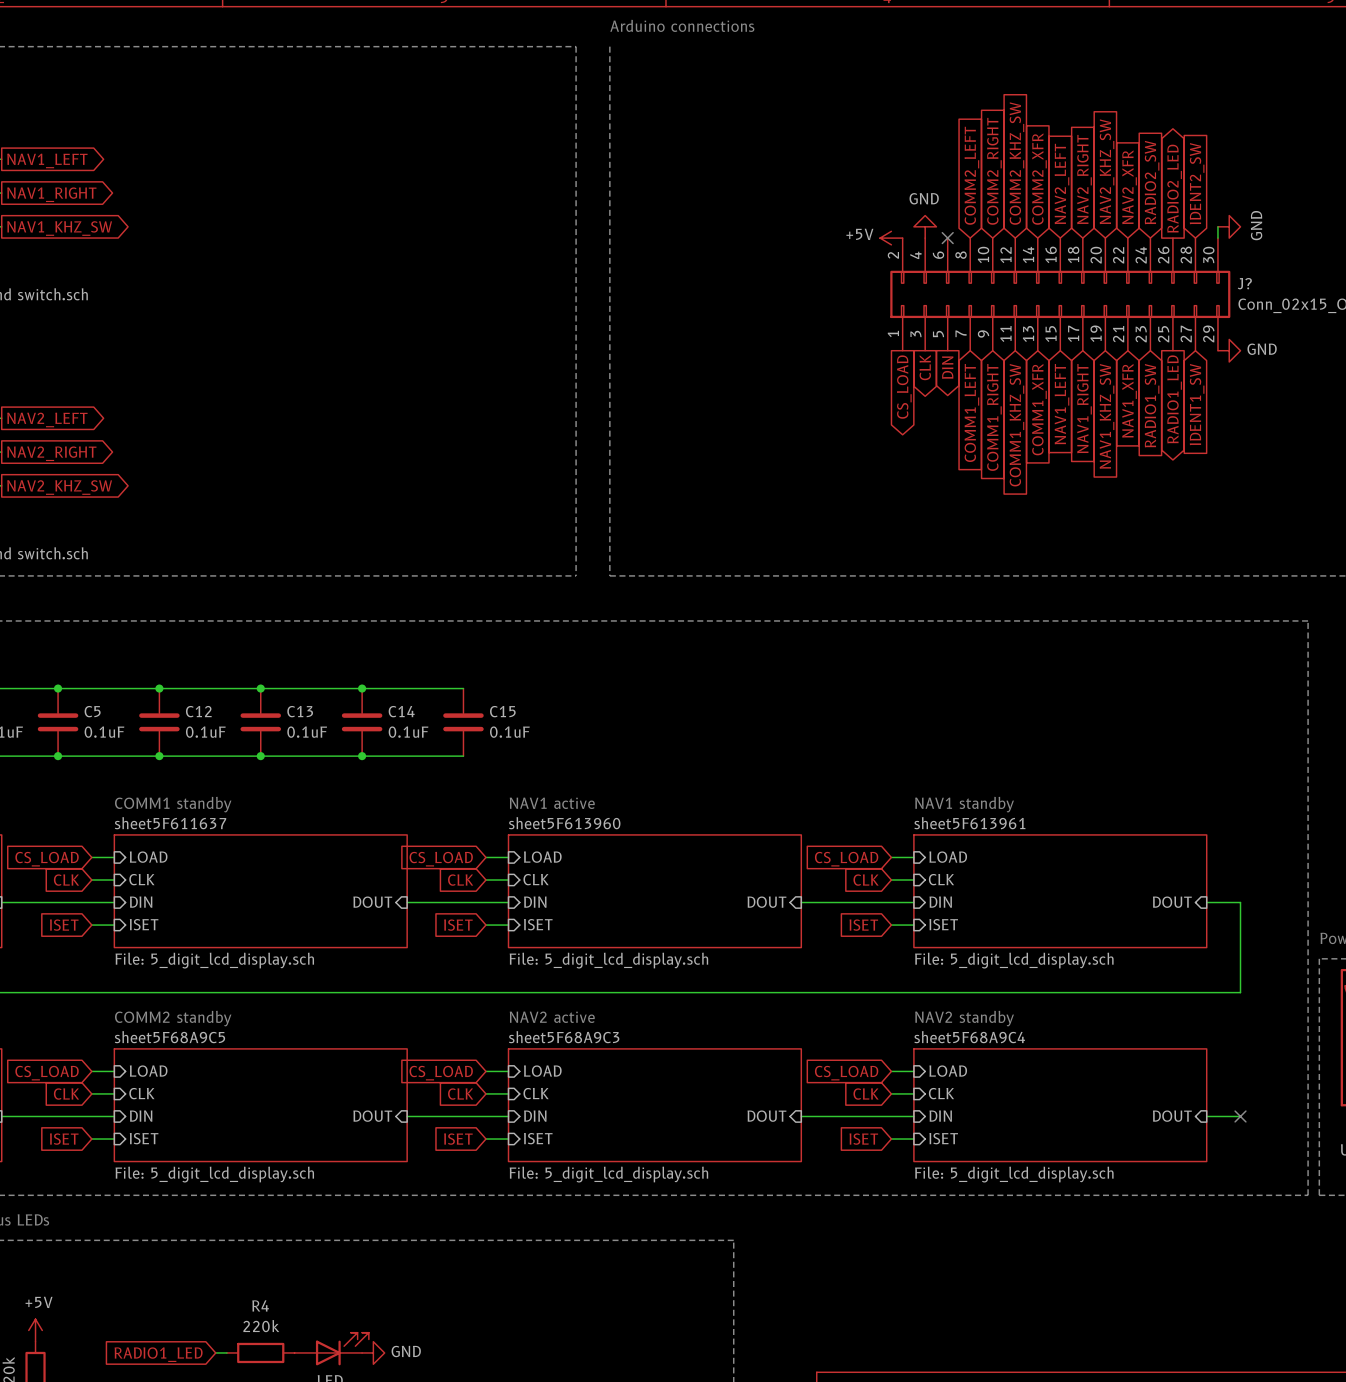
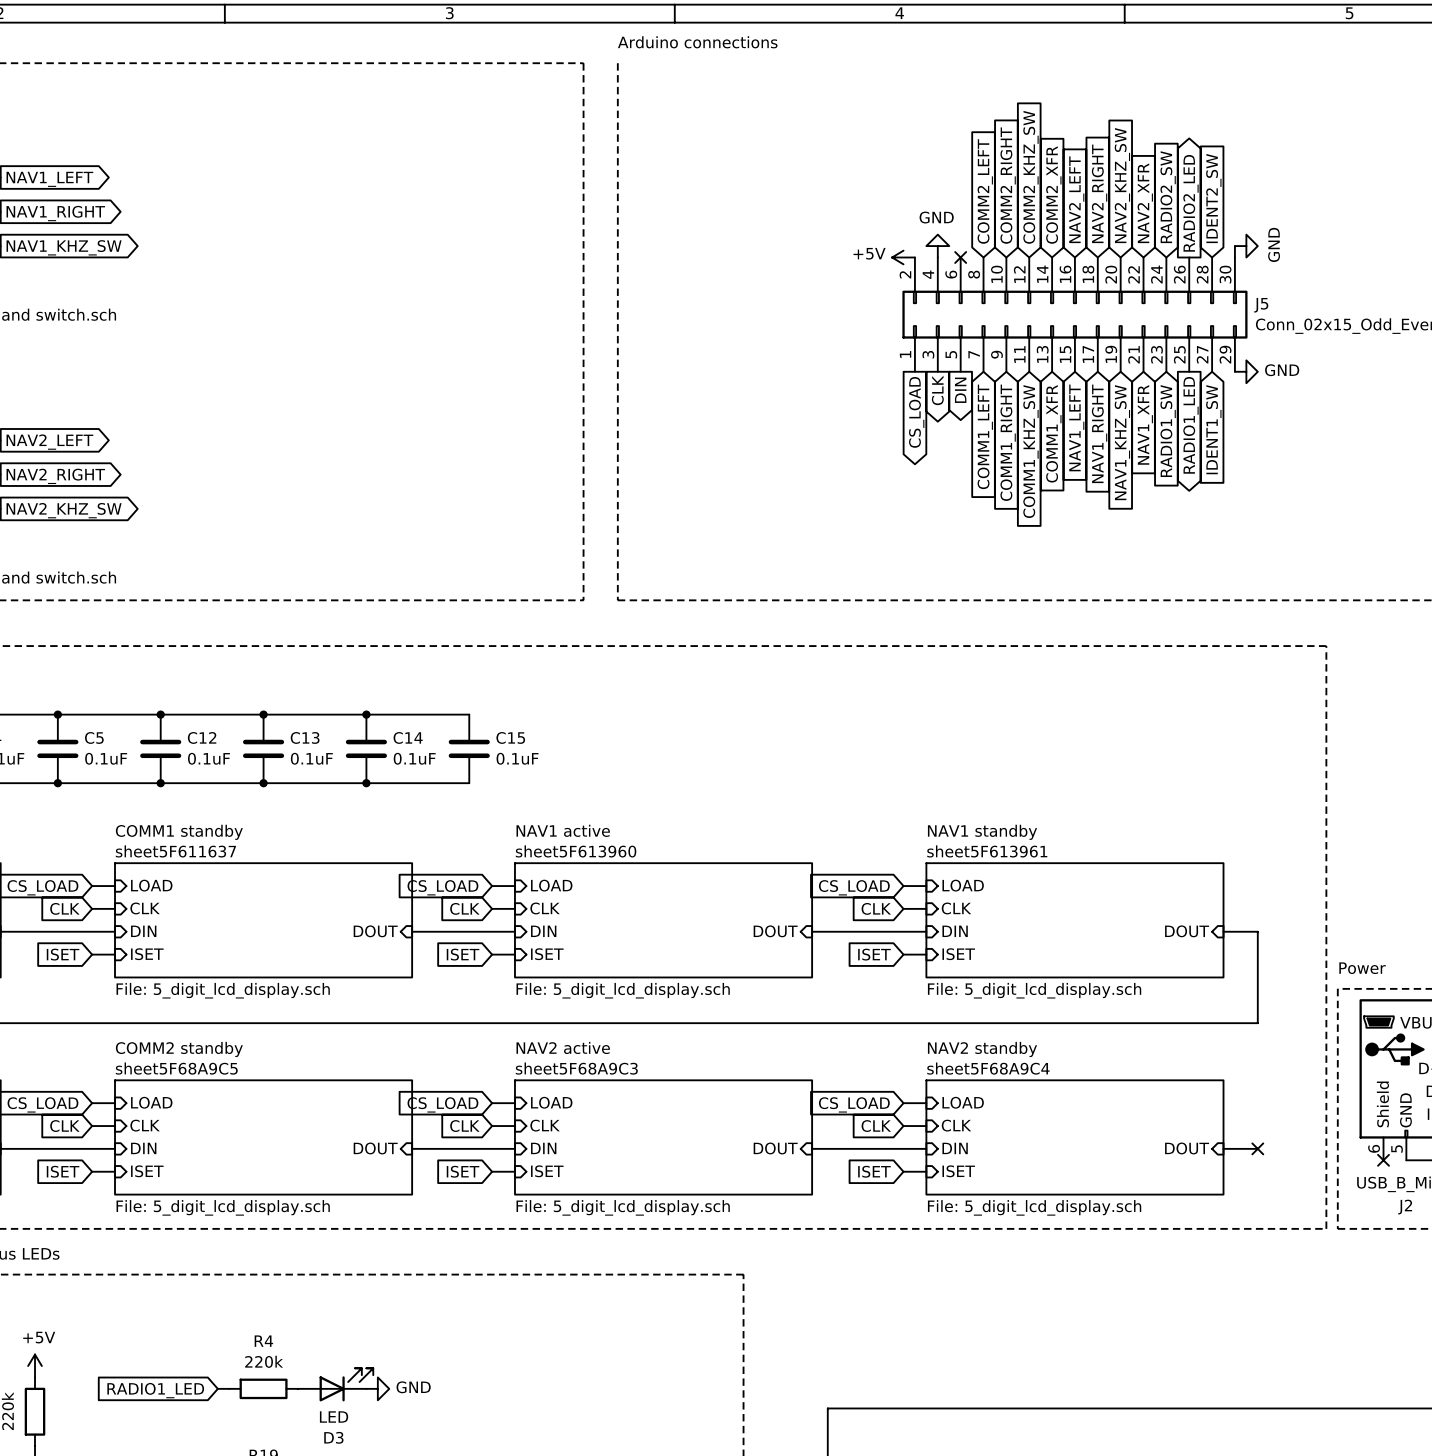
J? name: J? (1244, 283) -> J5 (1261, 305)

